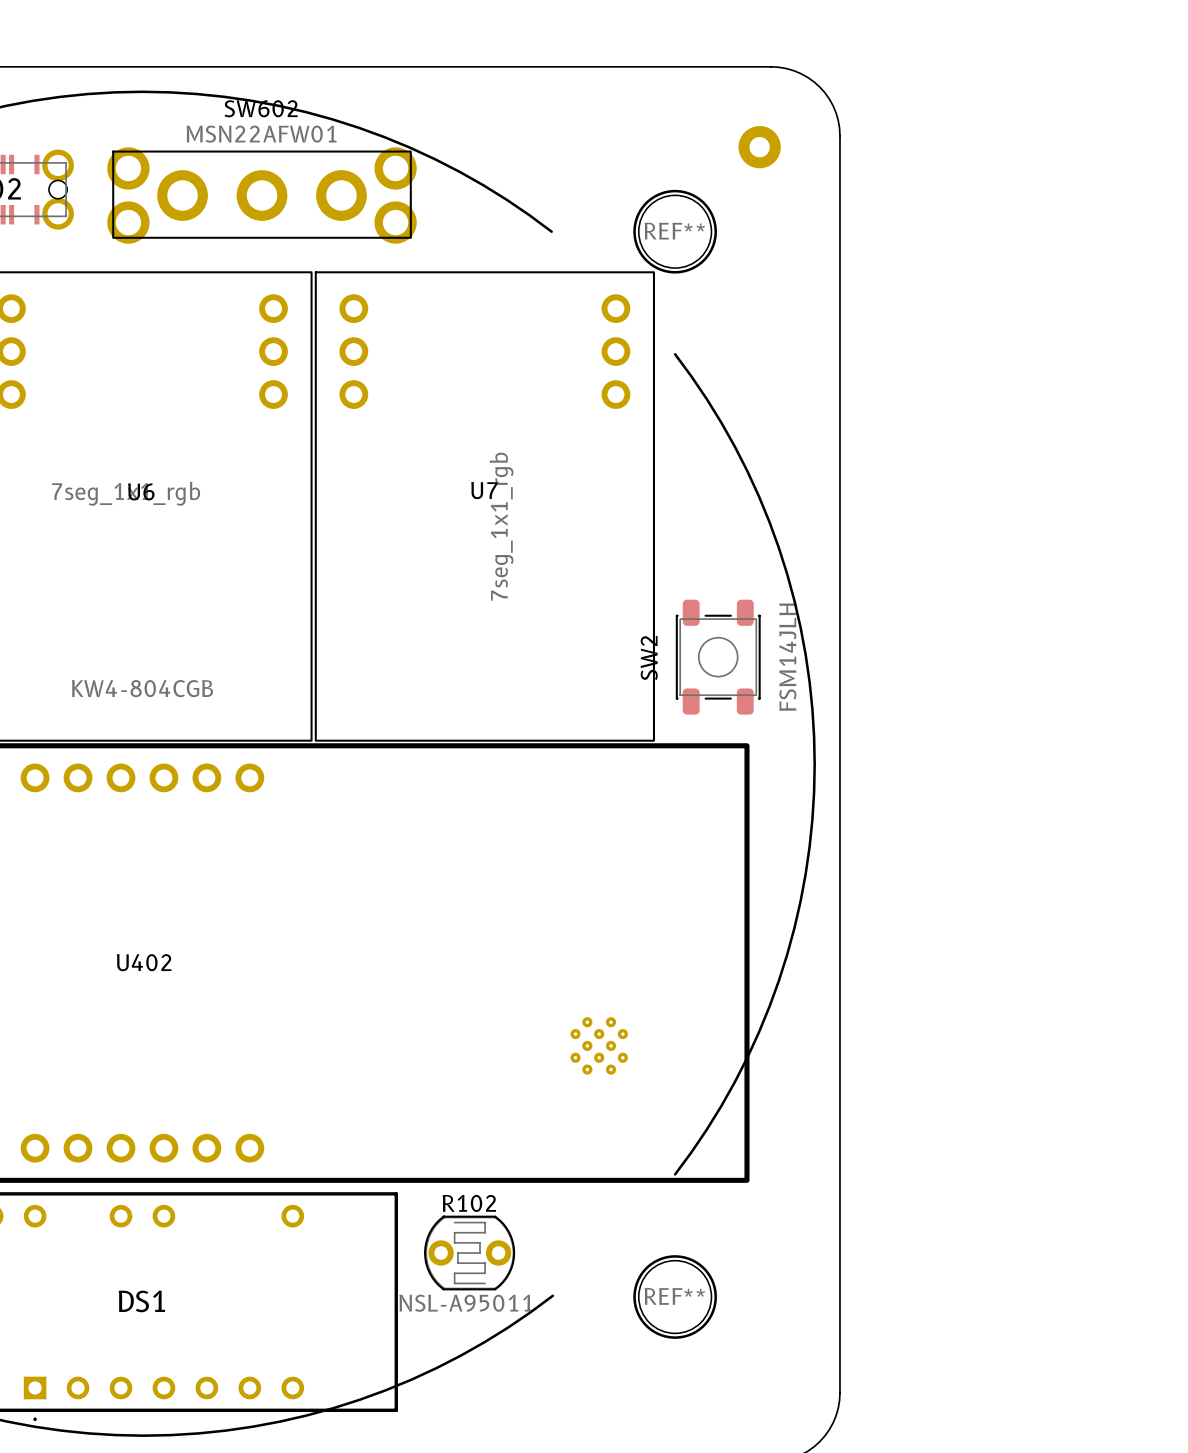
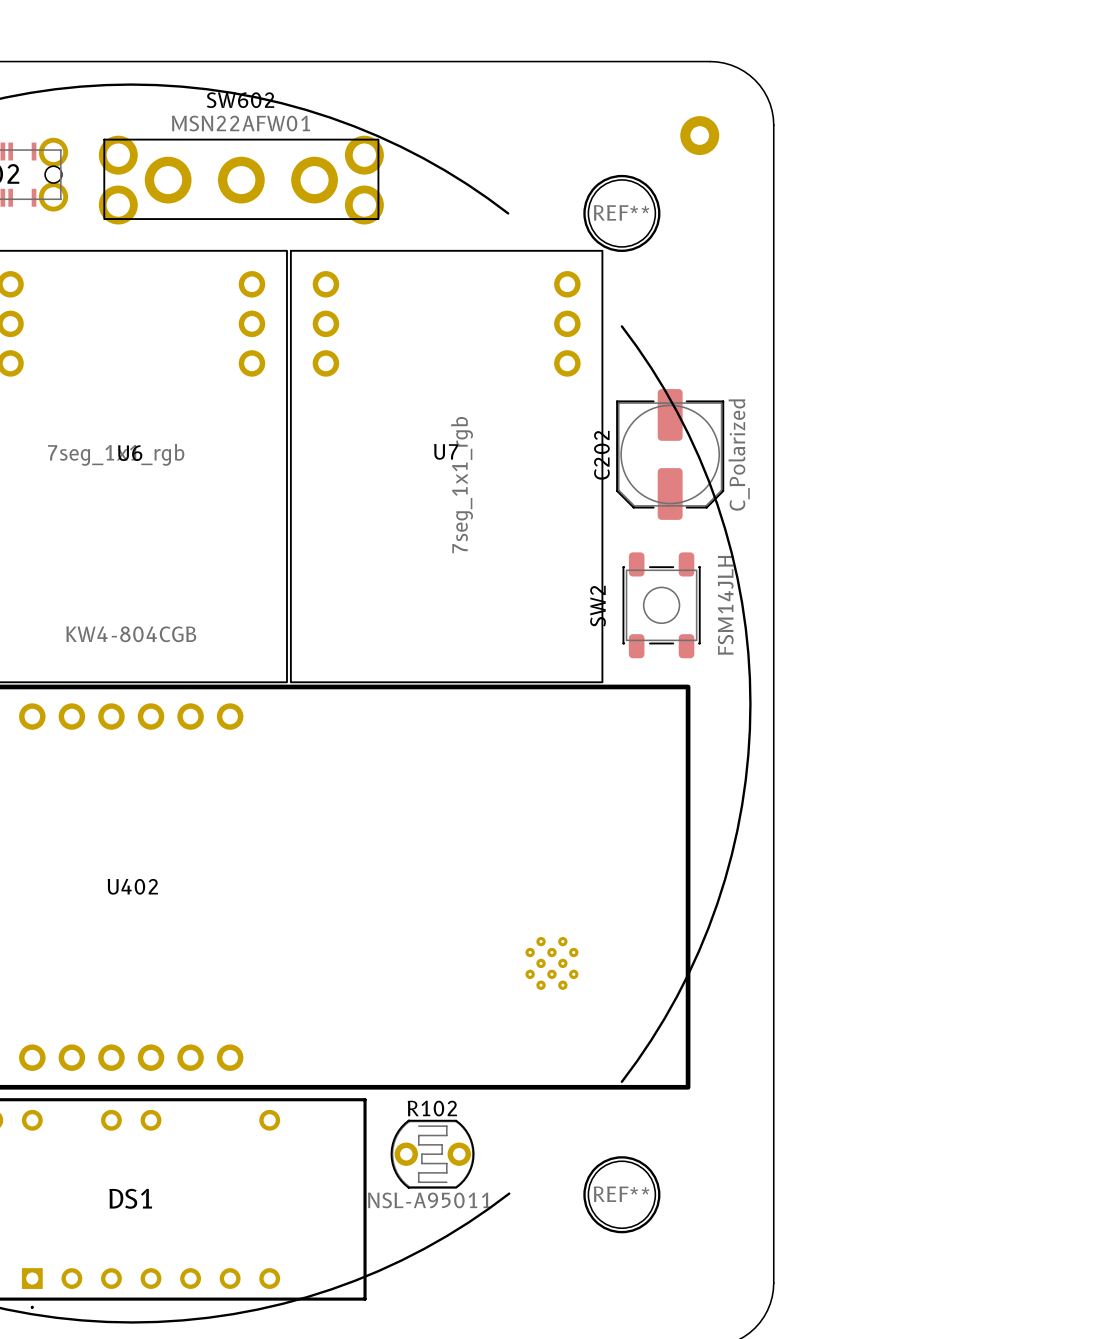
C202: none -> C_Polarized (670, 454)

